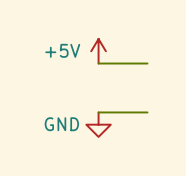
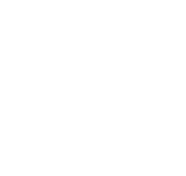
power symbol: +5V (98, 51) -> none
wire: (98, 63) (147, 63) -> none
wire: (98, 112) (147, 112) -> none
power symbol: GND (98, 124) -> none

